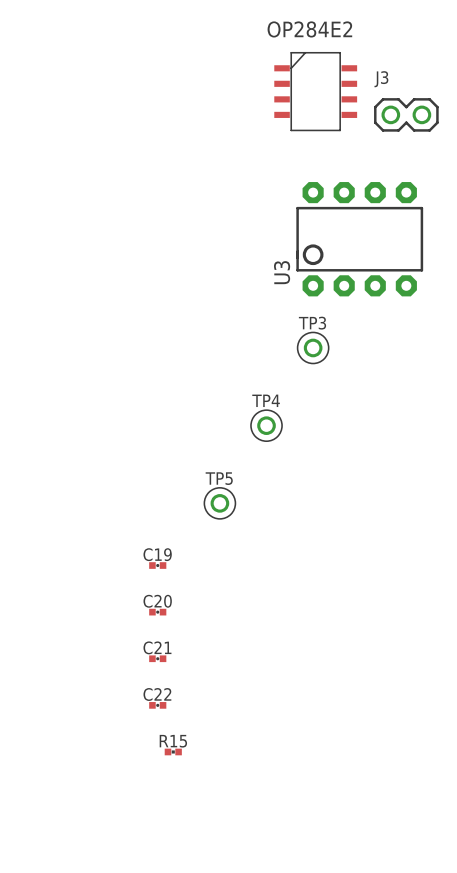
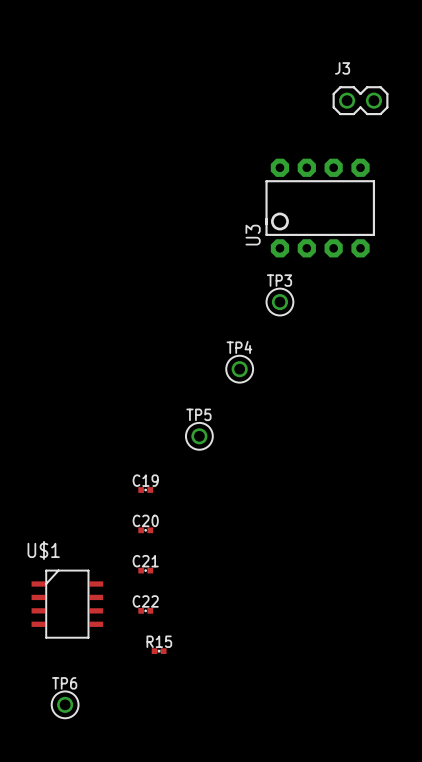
OP284E2: (315, 91) -> none
U$1: none -> (67, 604)
TP6: none -> (65, 704)

